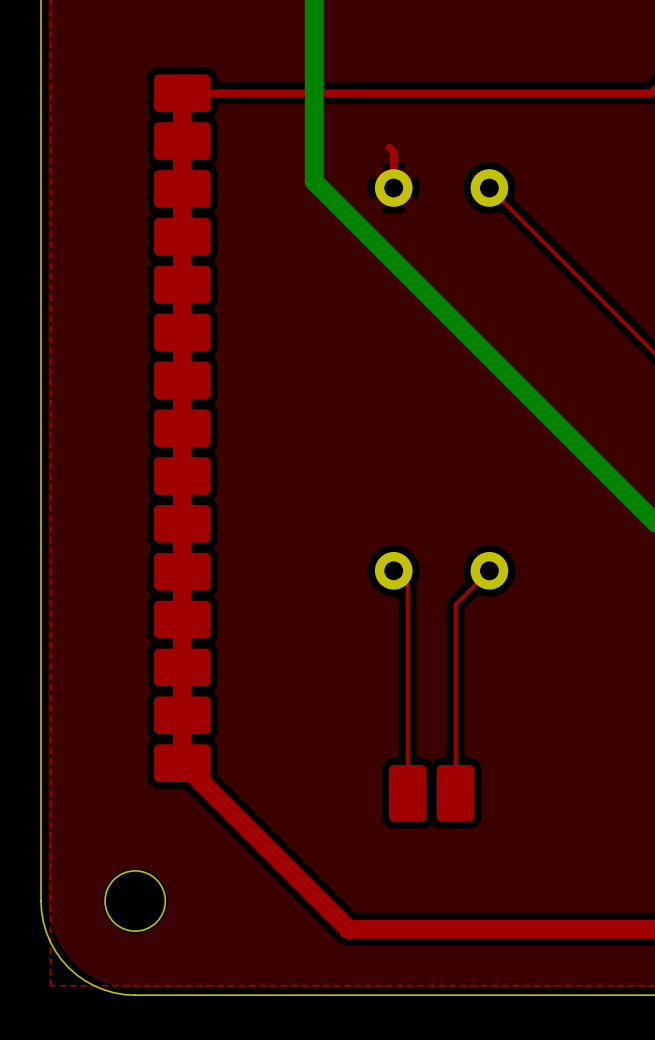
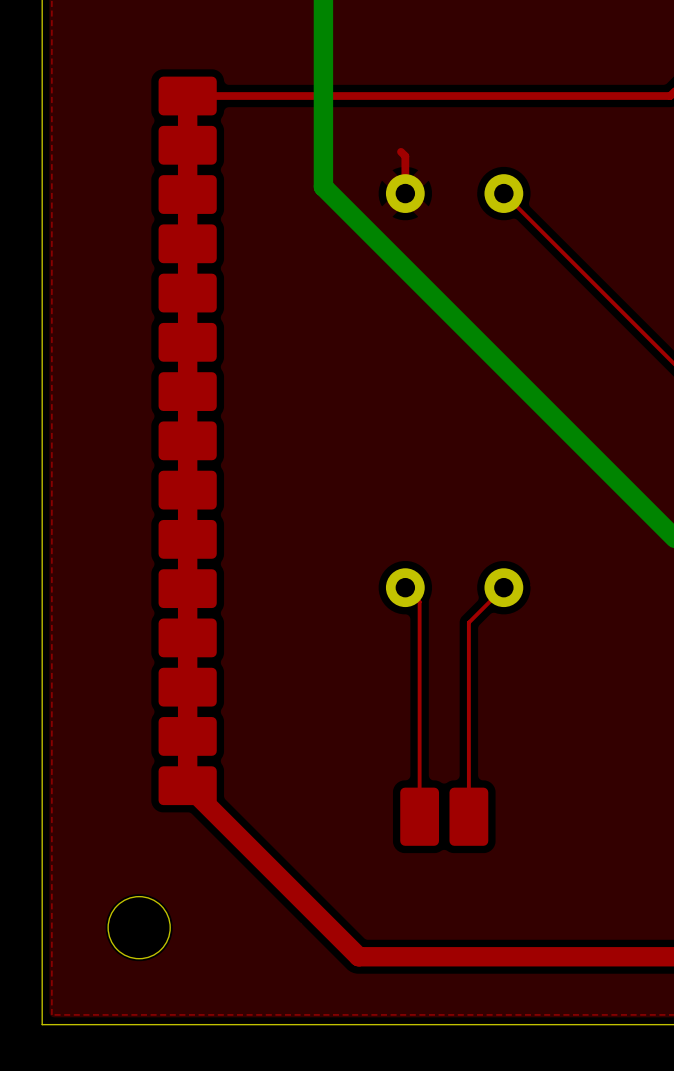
board edge: (40, 901) (46, 932) (55, 951) (68, 967) (85, 980) (104, 989) (135, 995) -> (42, 927) (42, 1024) (139, 1024)

